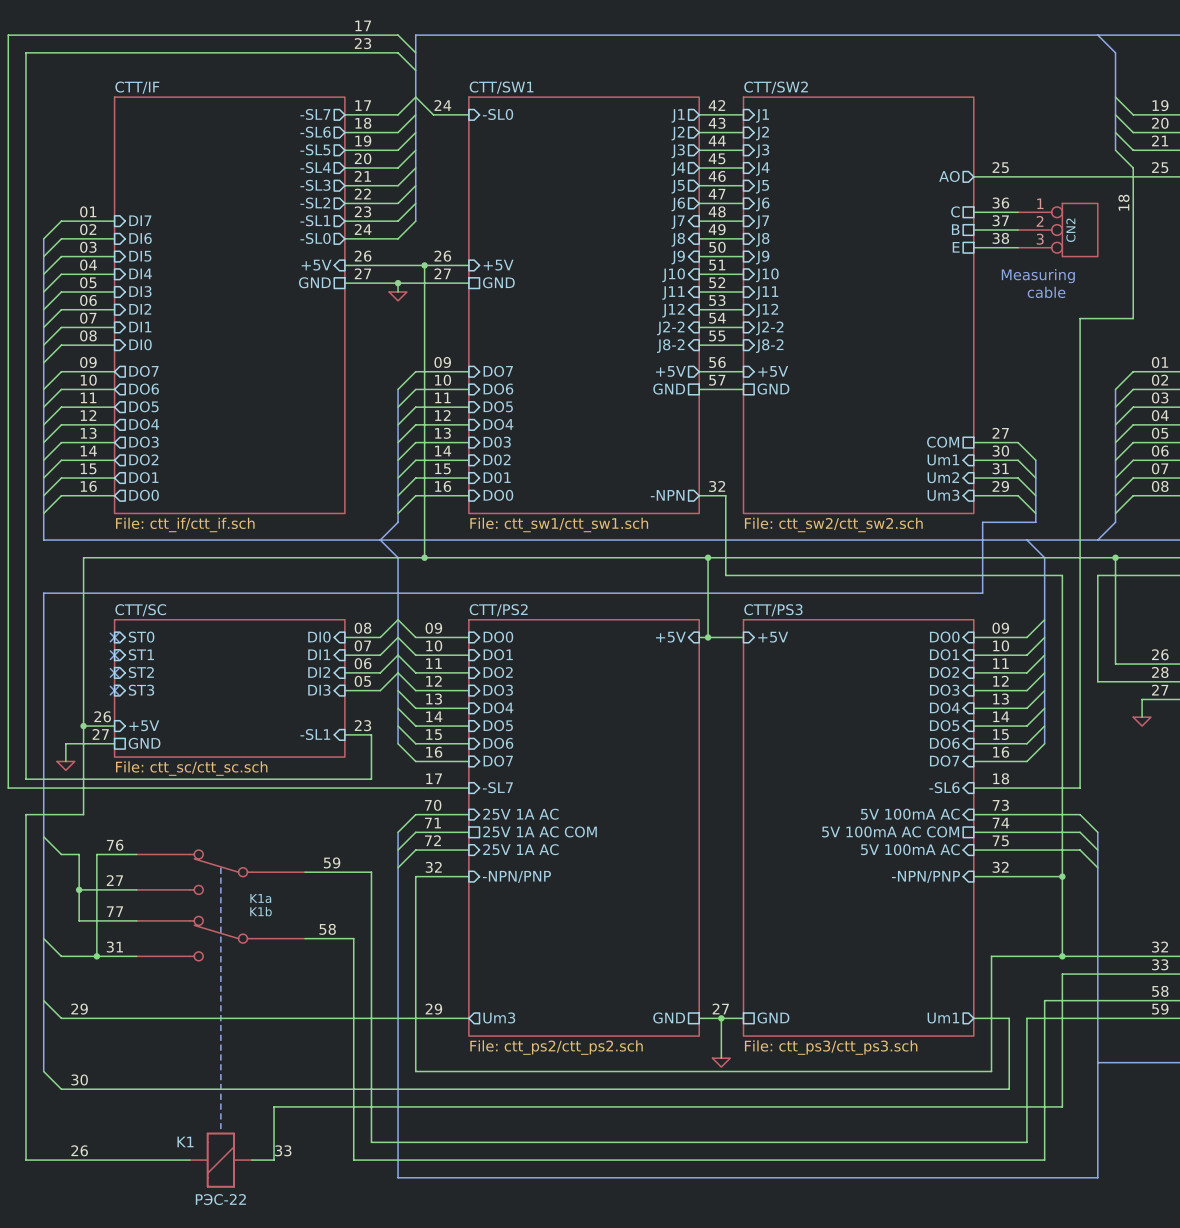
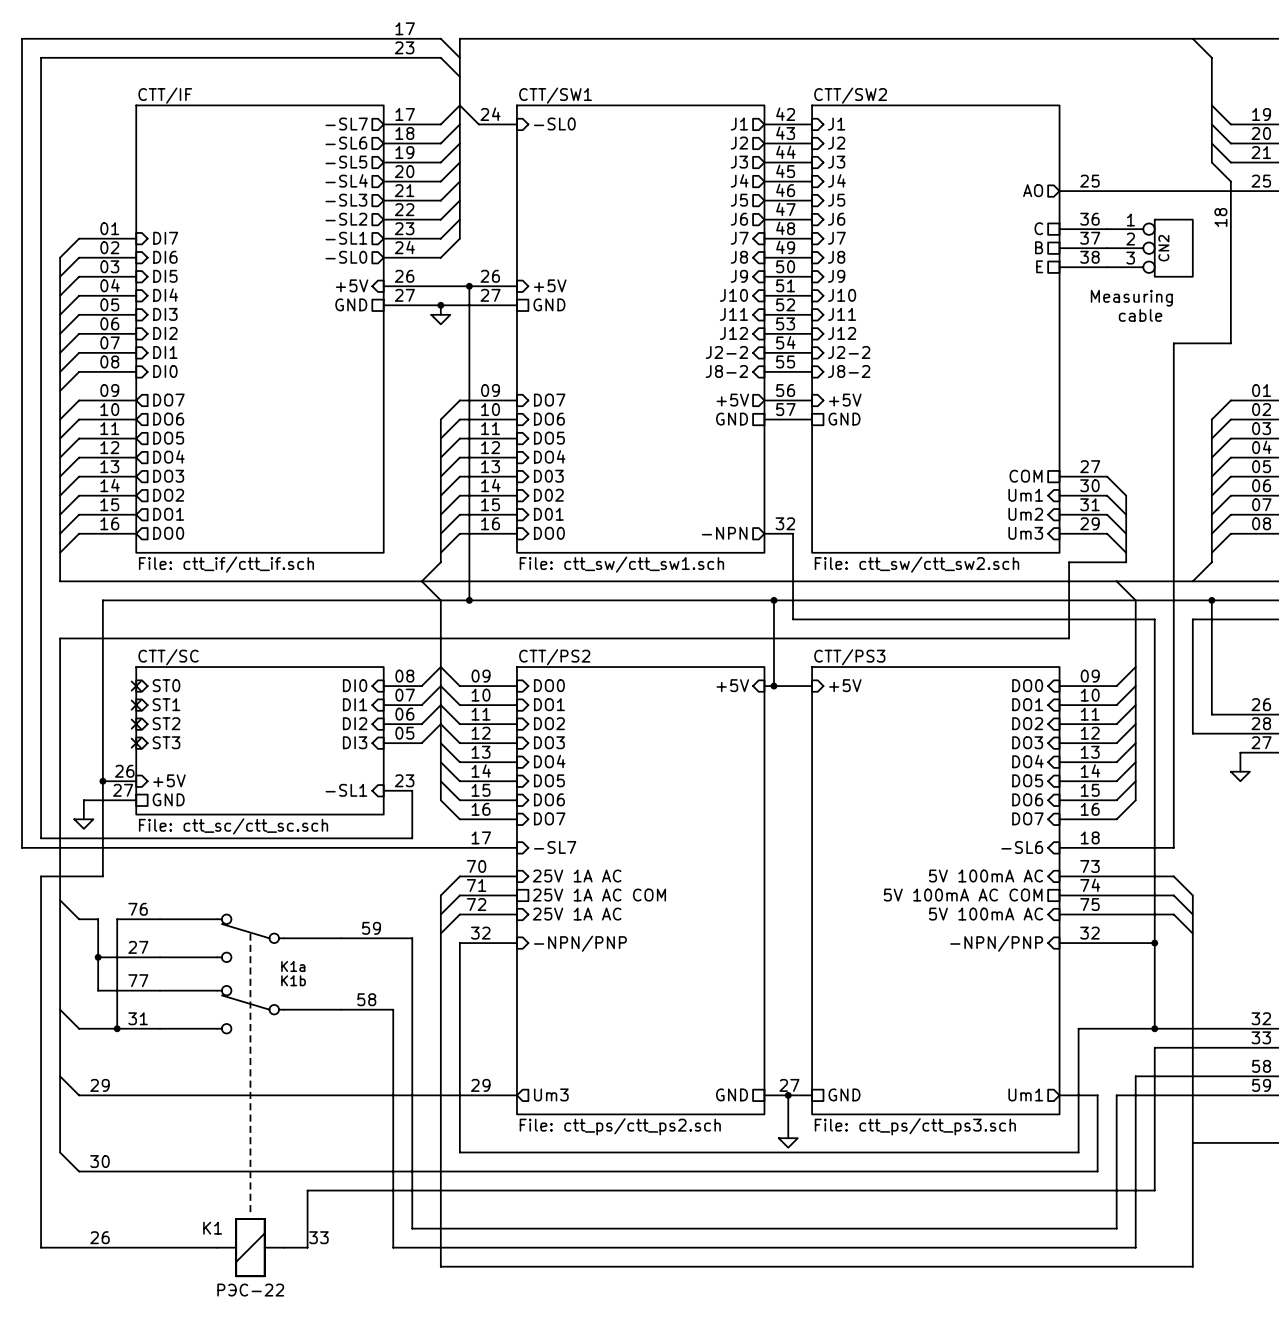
sheet CTT/SW1 value: File: ctt_sw1/ctt_sw1.sch (559, 524) -> File: ctt_sw/ctt_sw1.sch (621, 564)
sheet CTT/SW2 value: File: ctt_sw2/ctt_sw2.sch (833, 524) -> File: ctt_sw/ctt_sw2.sch (916, 564)
sheet CTT/PS2 value: File: ctt_ps2/ctt_ps2.sch (556, 1047) -> File: ctt_ps/ctt_ps2.sch (620, 1126)
sheet CTT/PS3 value: File: ctt_ps3/ctt_ps3.sch (831, 1047) -> File: ctt_ps/ctt_ps3.sch (915, 1126)

